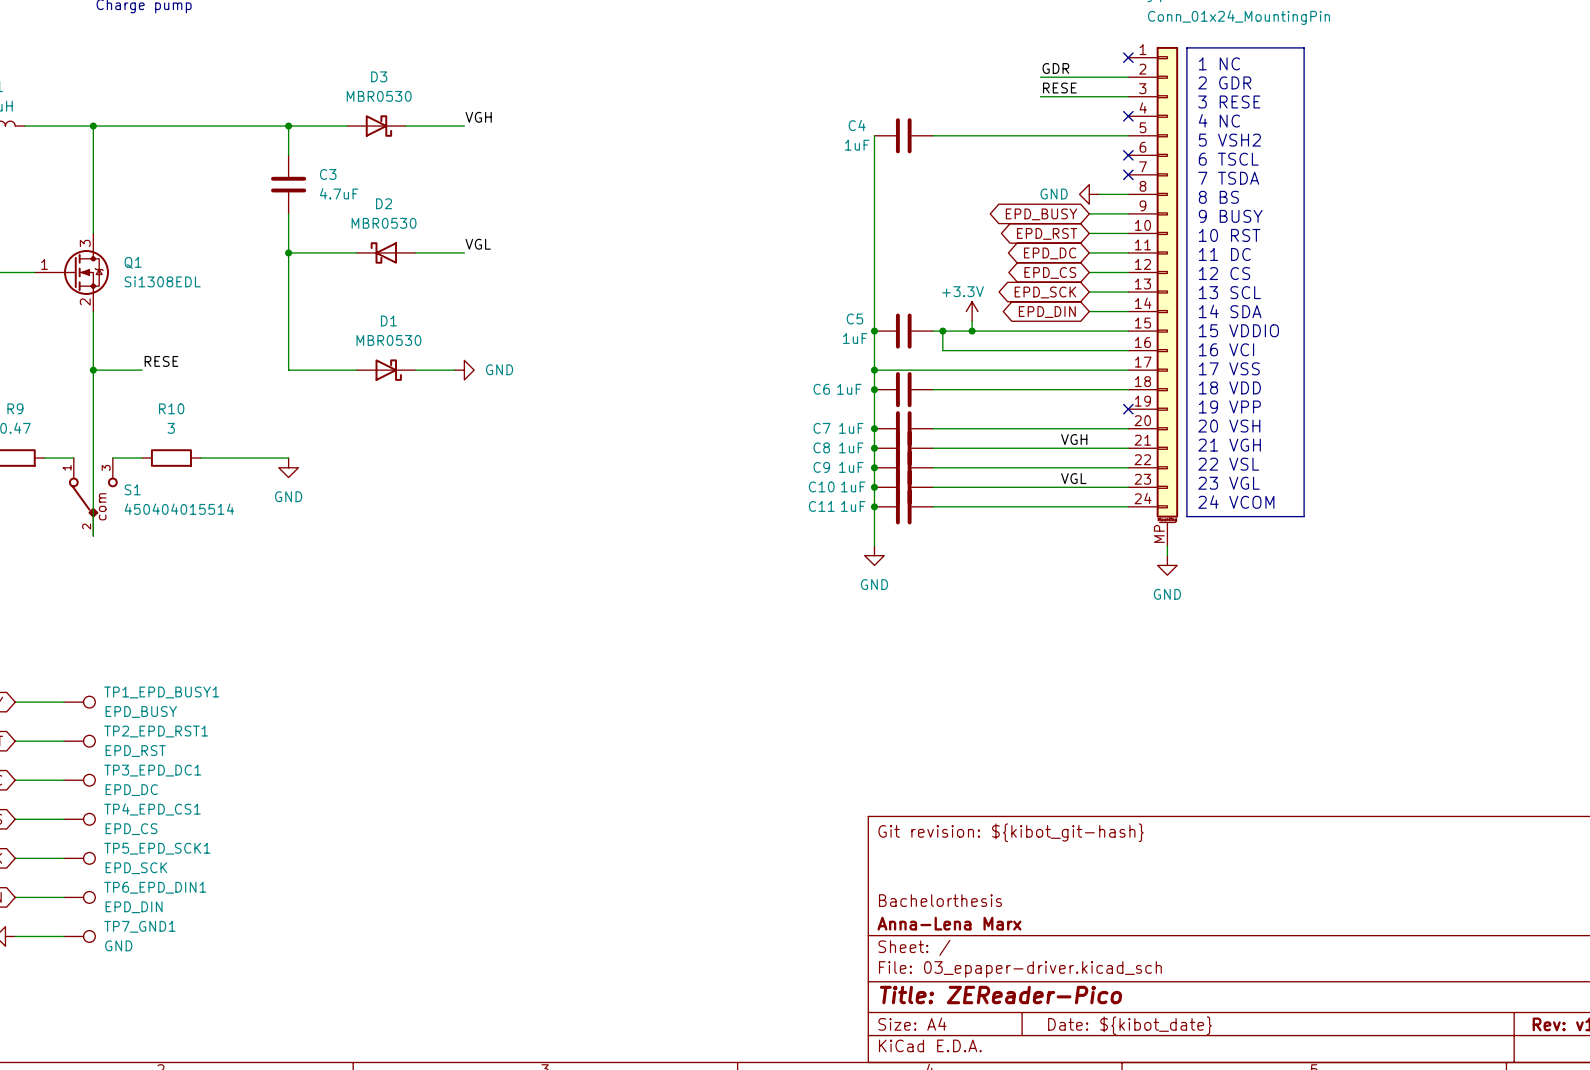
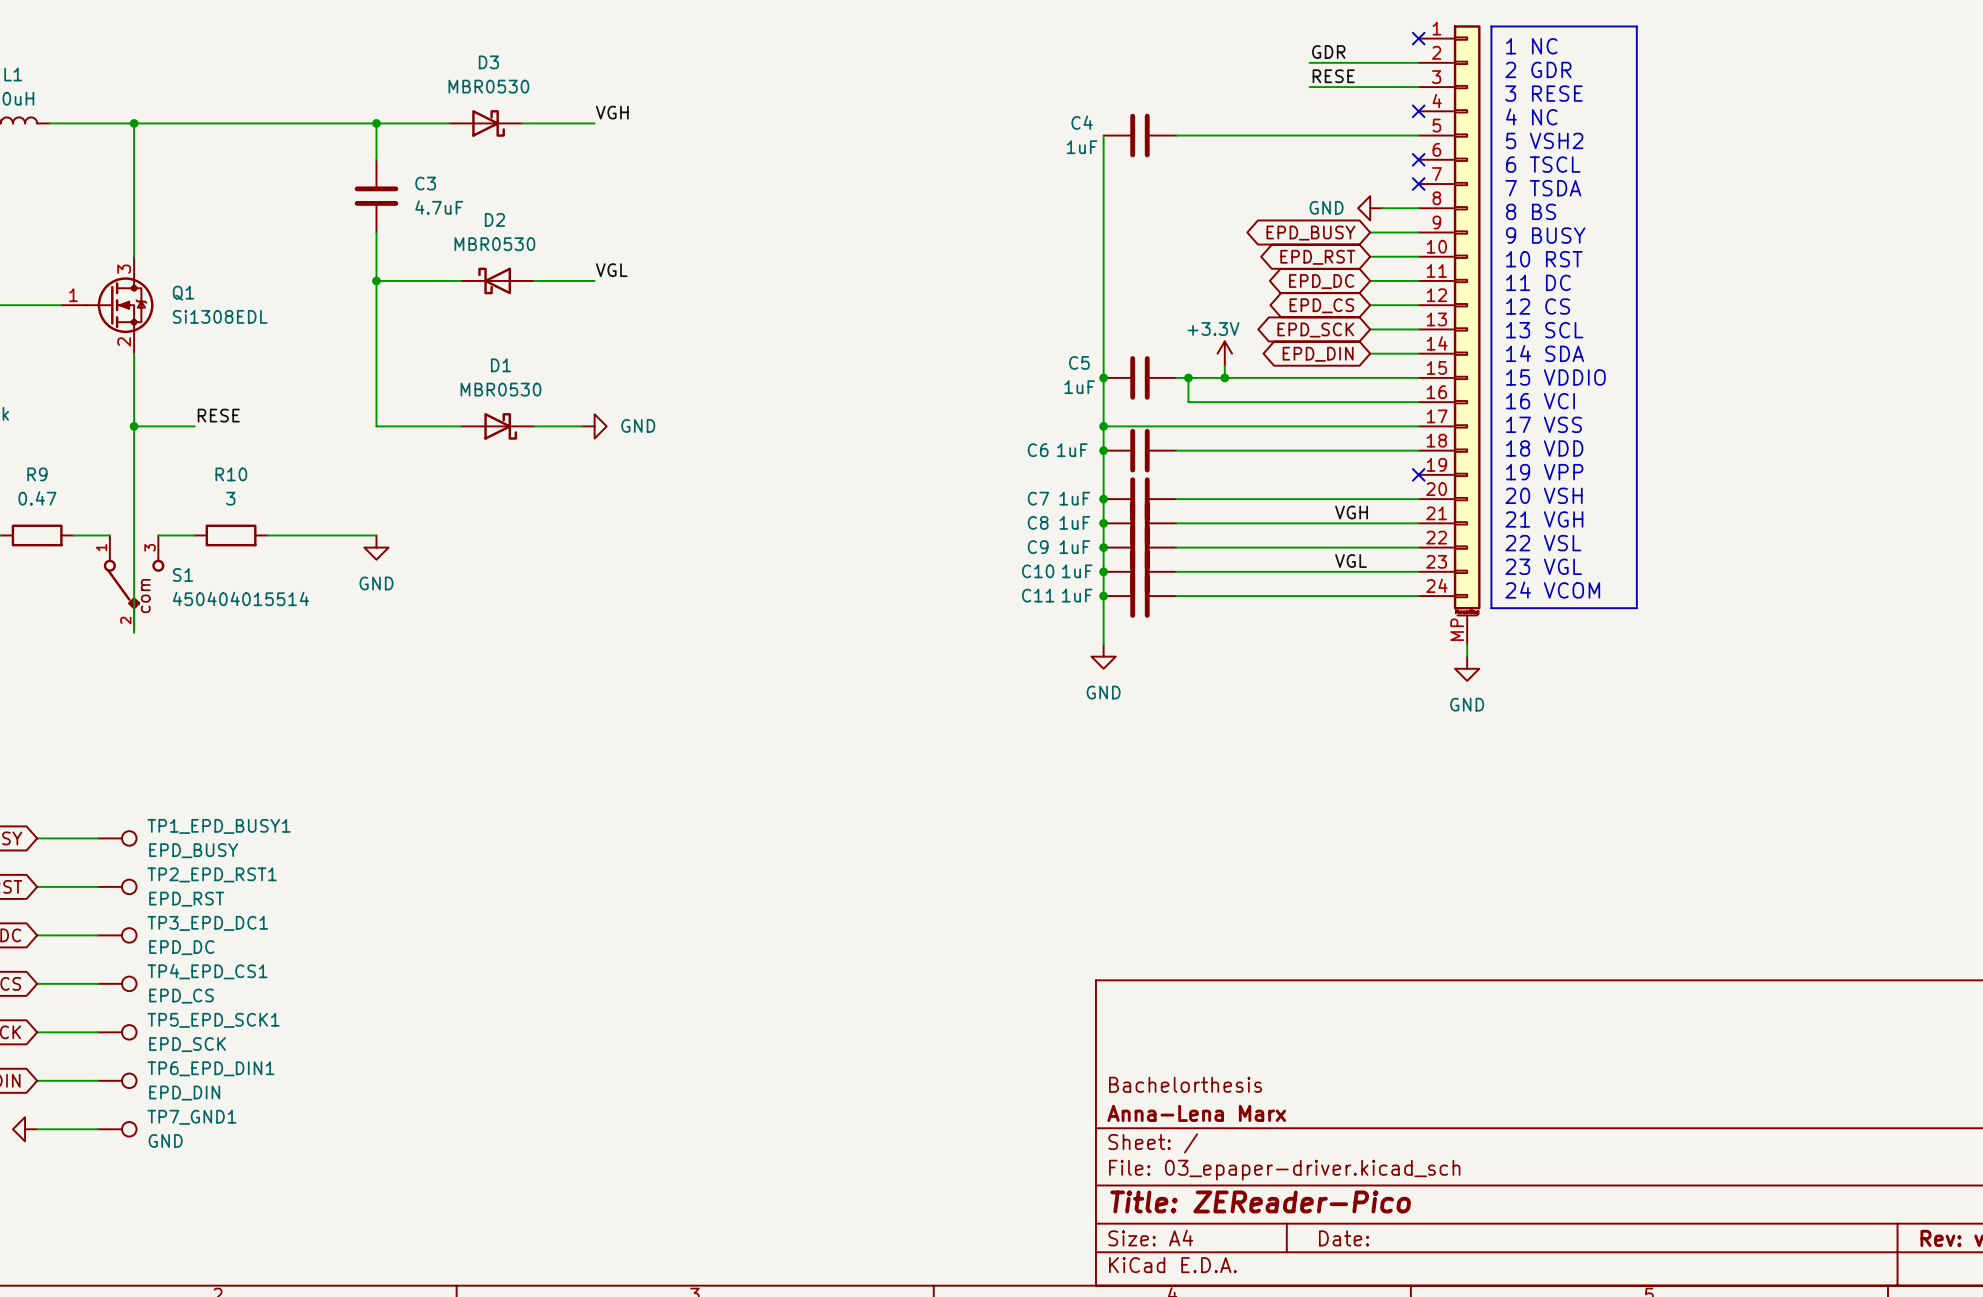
title block: Git revision: ${kibot_git-hash} (1011, 832) -> none
title block: Date: ${kibot_date} (1129, 1025) -> Date: (1344, 1238)

